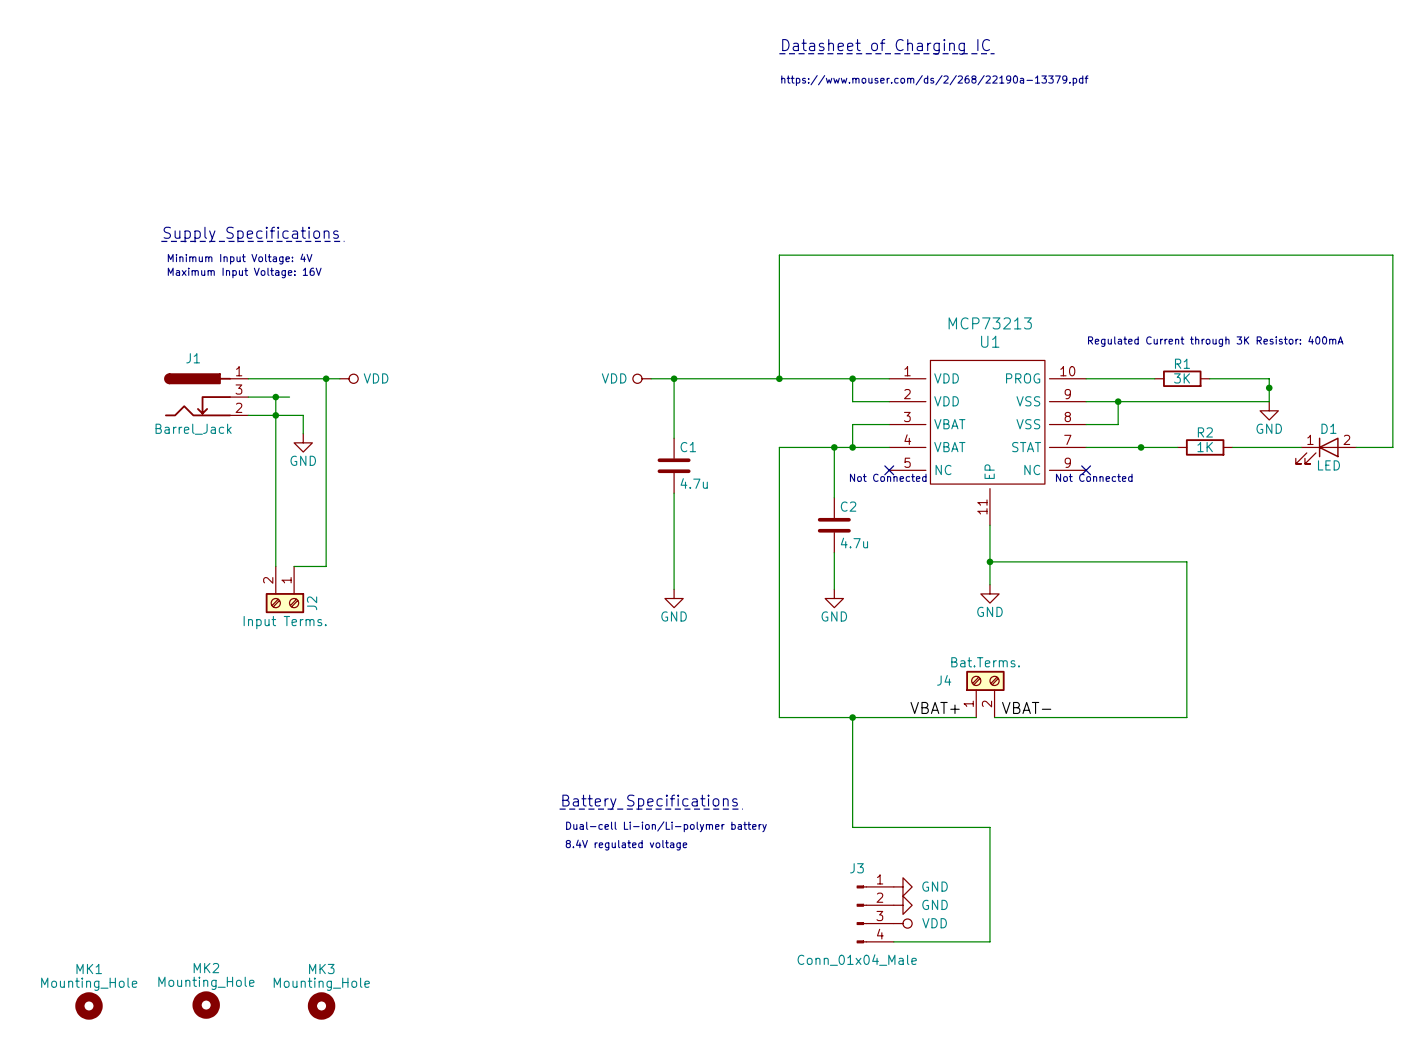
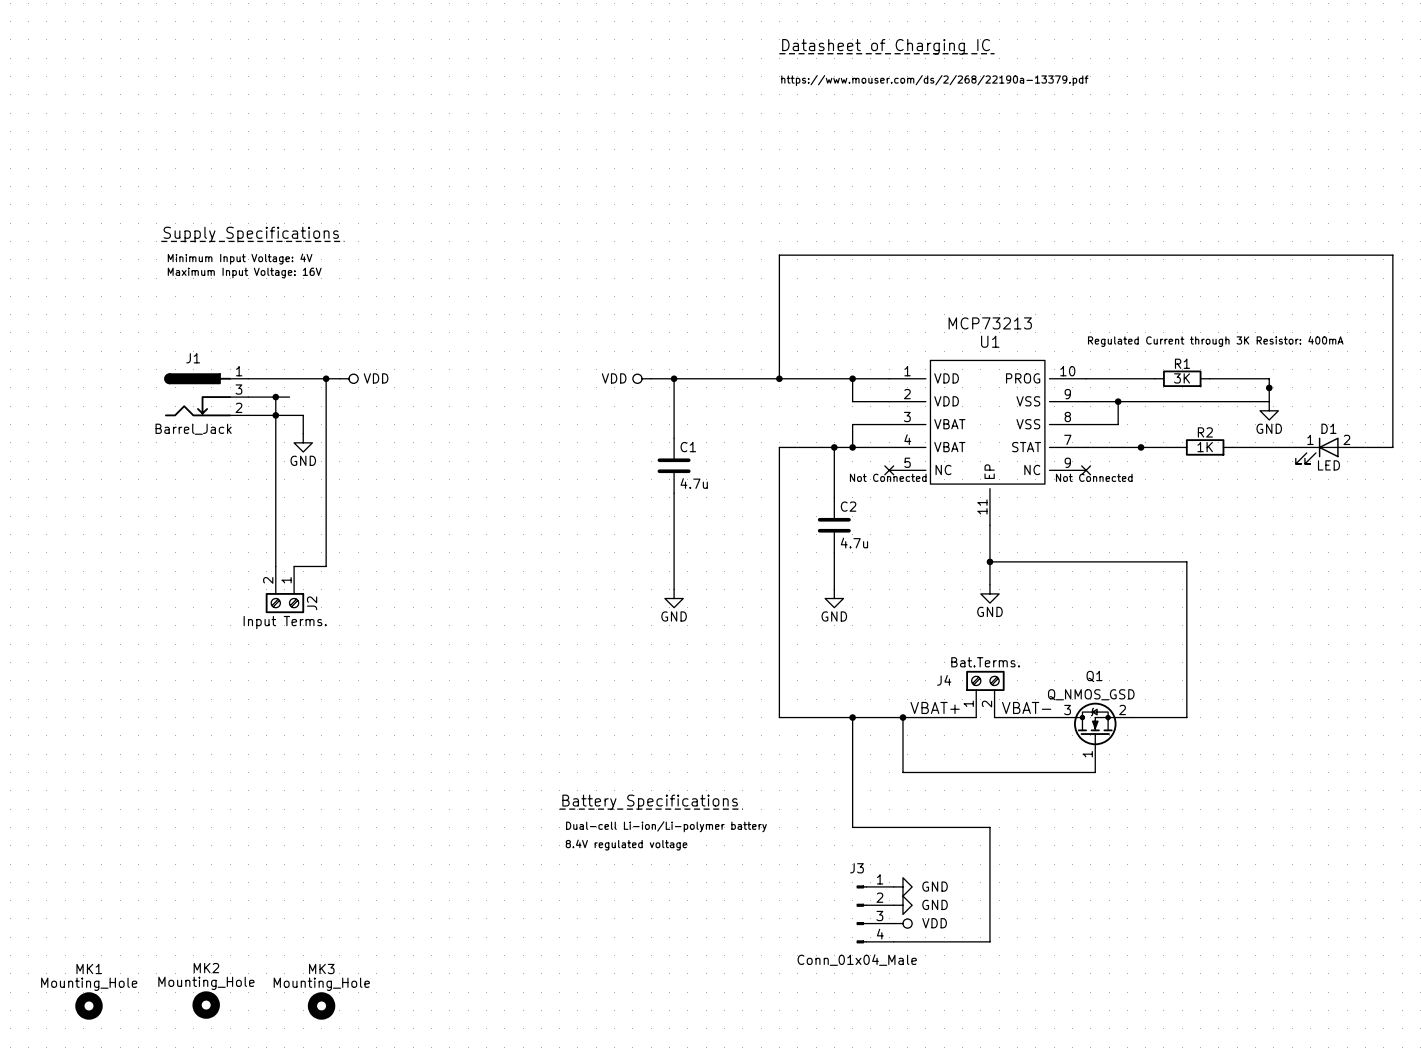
wire: none -> (902, 717) (902, 772) (1095, 772)
junction: none -> (902, 717)
Q1: none -> Q_NMOS_GSD (1095, 737)

